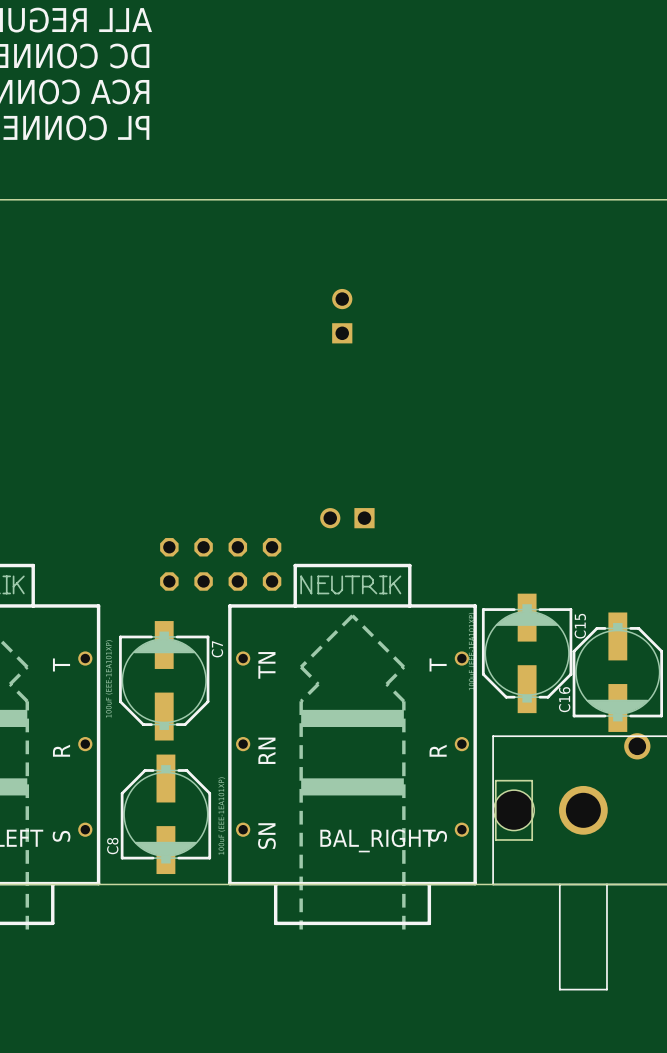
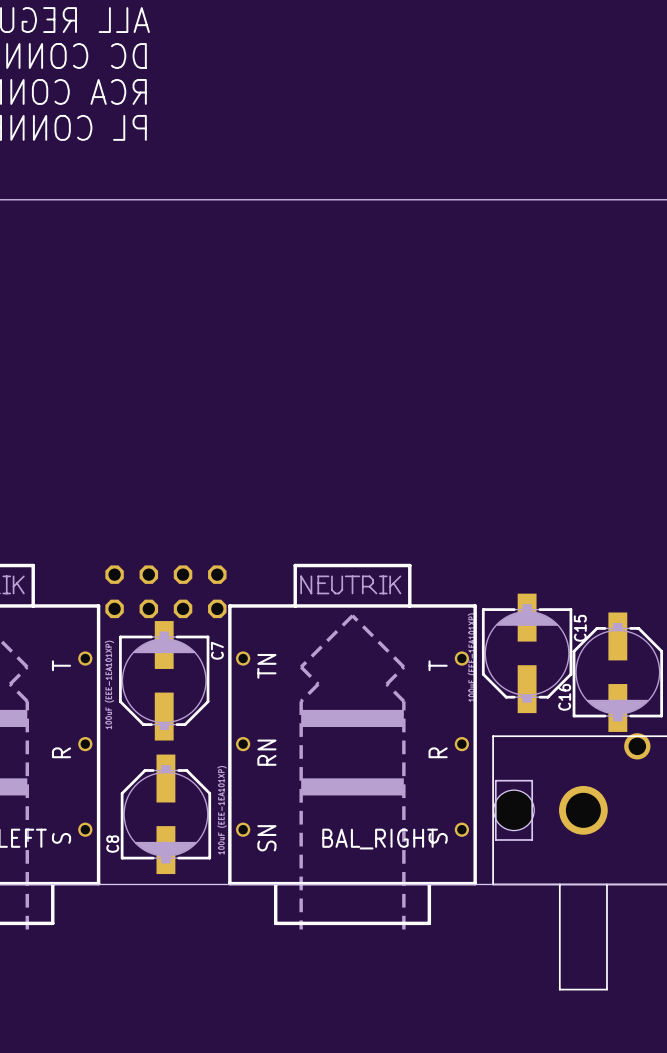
part: (342, 316) -> none
part: (347, 518) -> none
part position: (220, 564) -> (165, 591)

